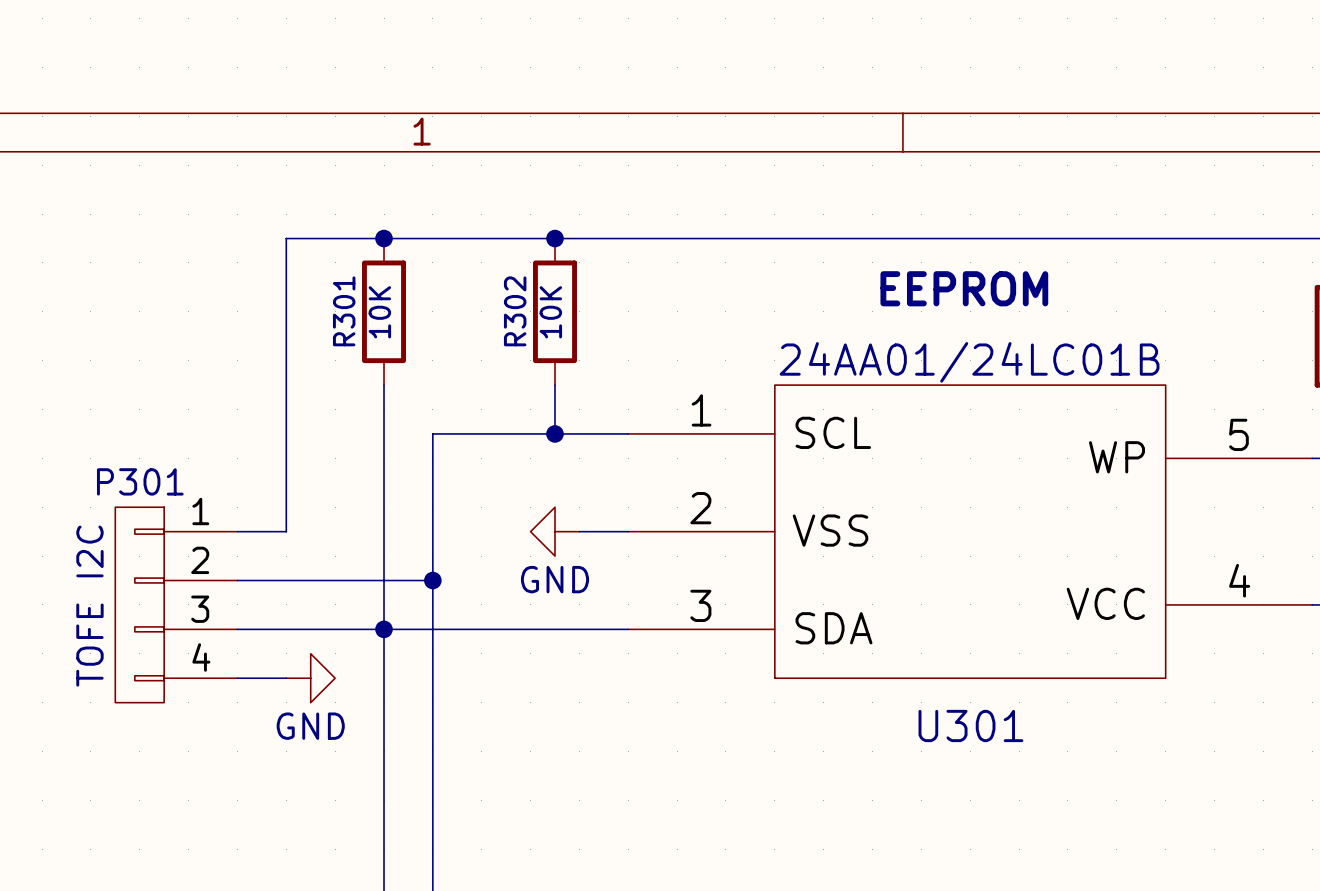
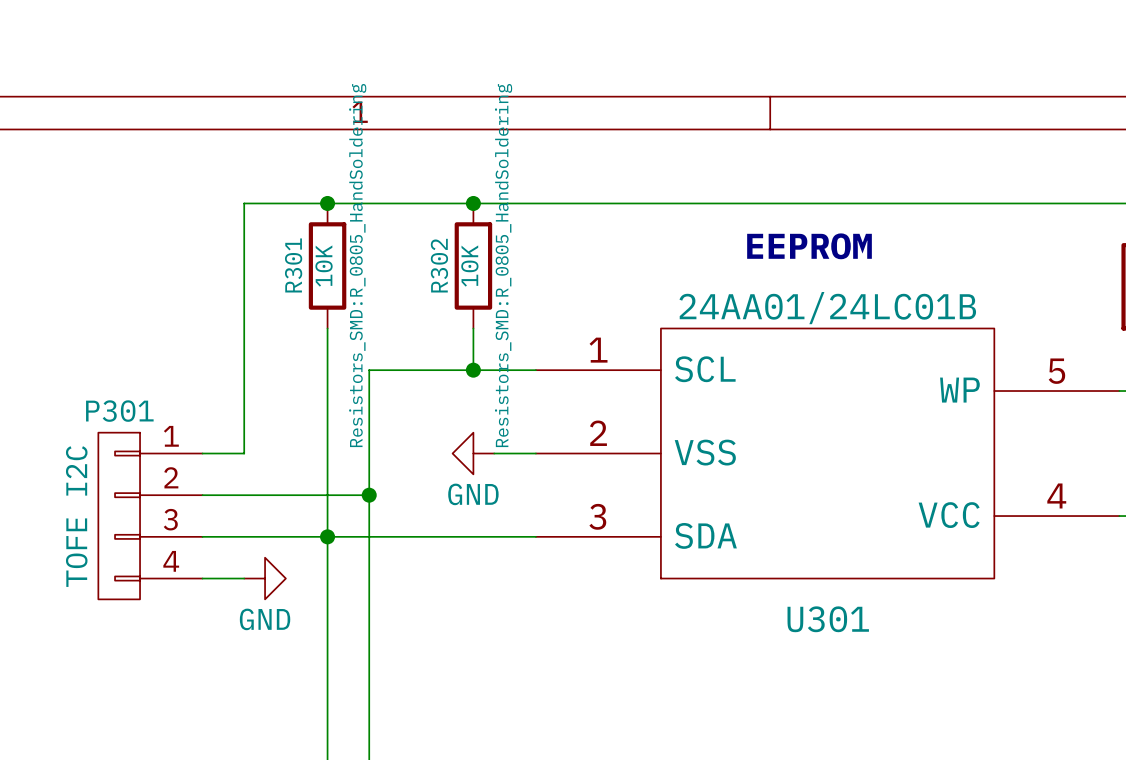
R301 text: none -> Resistors_SMD:R_0805_HandSoldering (357, 265)
R302 text: none -> Resistors_SMD:R_0805_HandSoldering (503, 265)

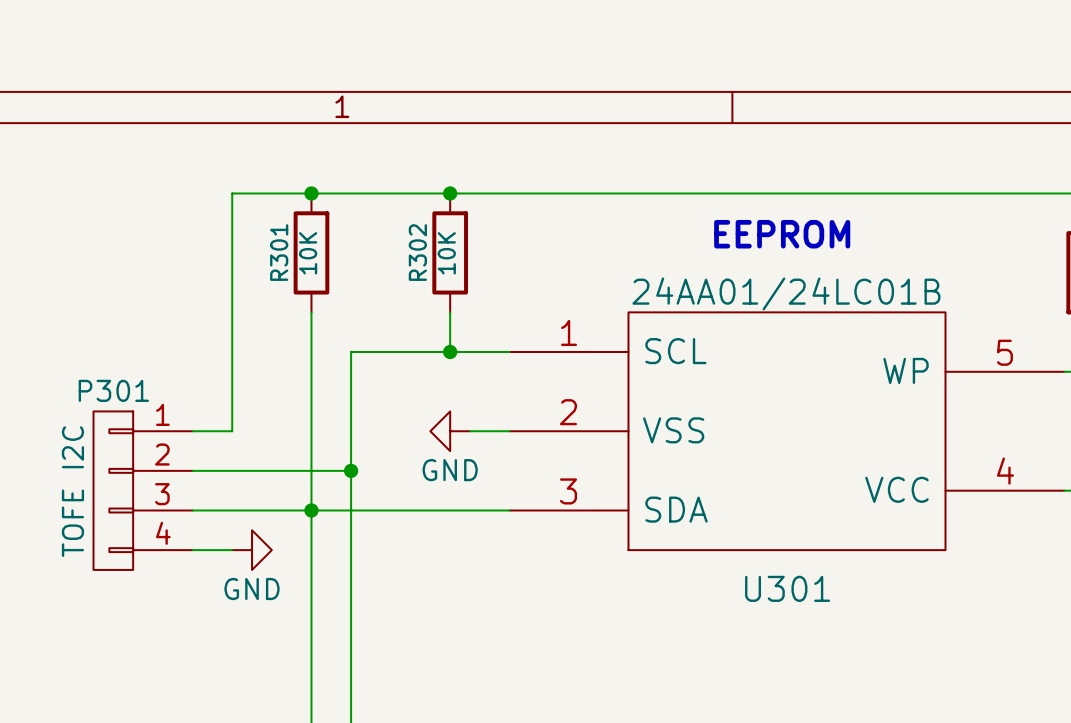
R301 text: Resistors_SMD:R_0805_HandSoldering (357, 265) -> none
R302 text: Resistors_SMD:R_0805_HandSoldering (503, 265) -> none

